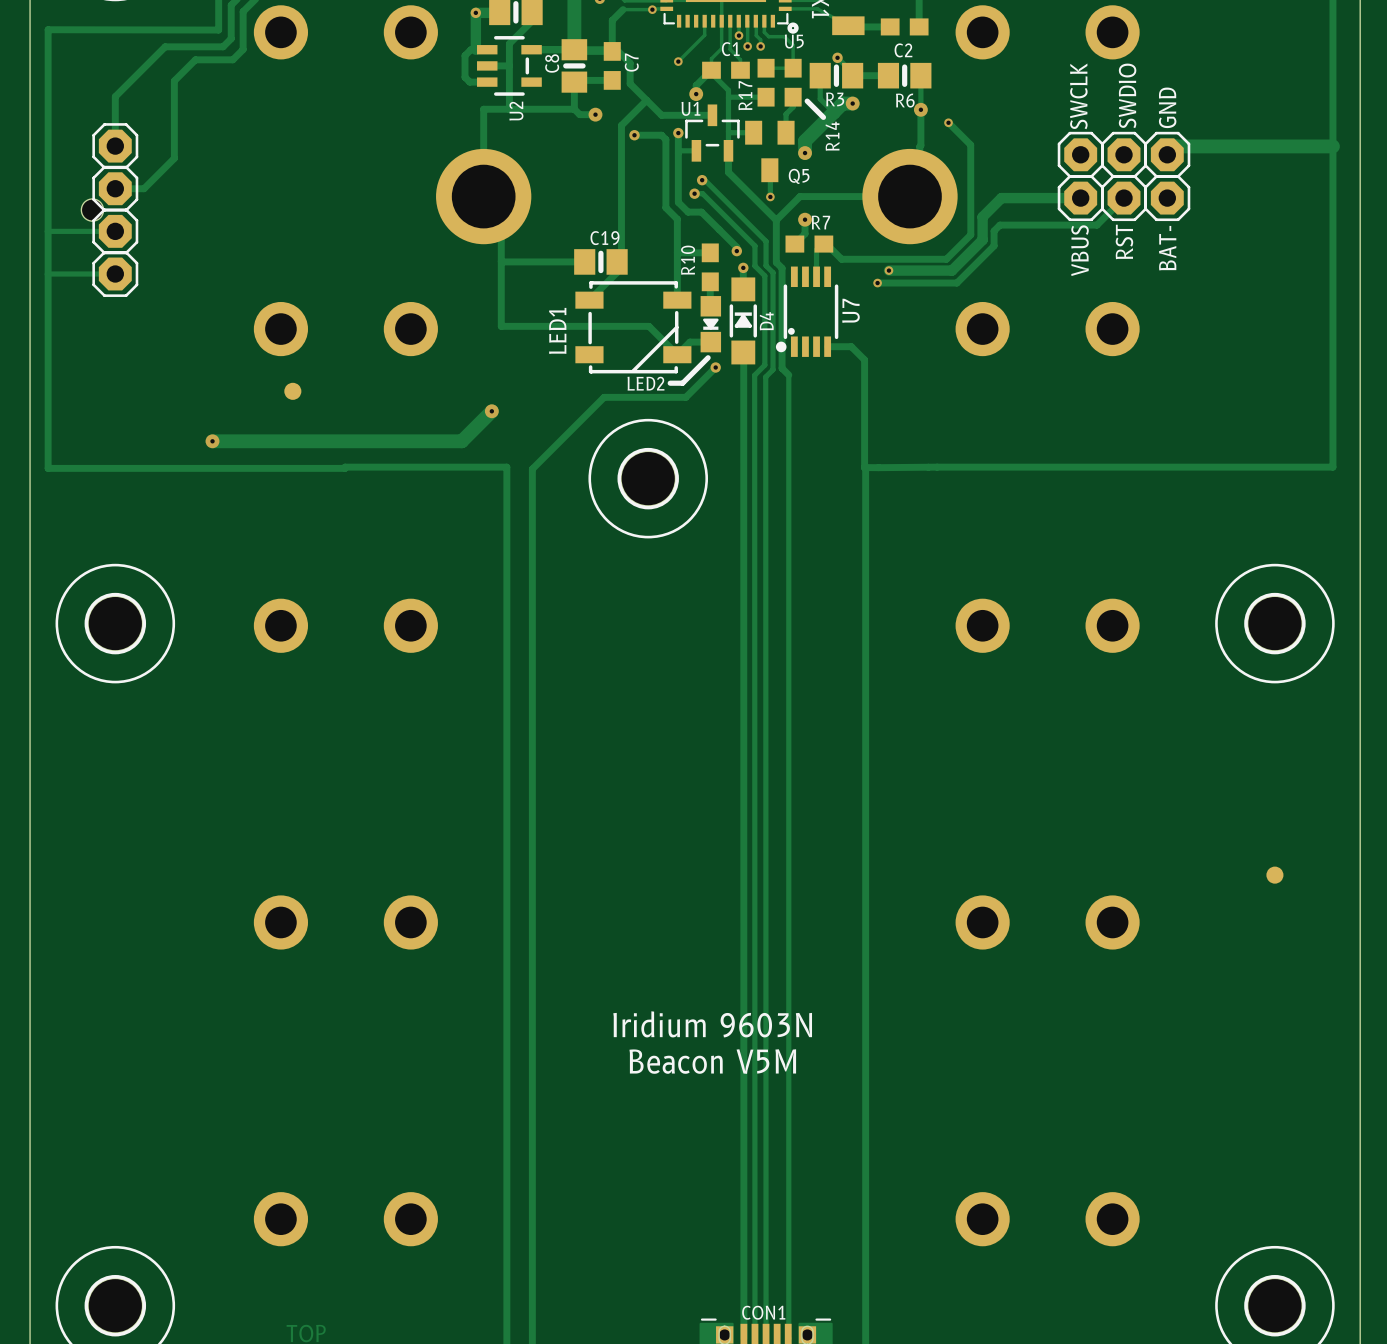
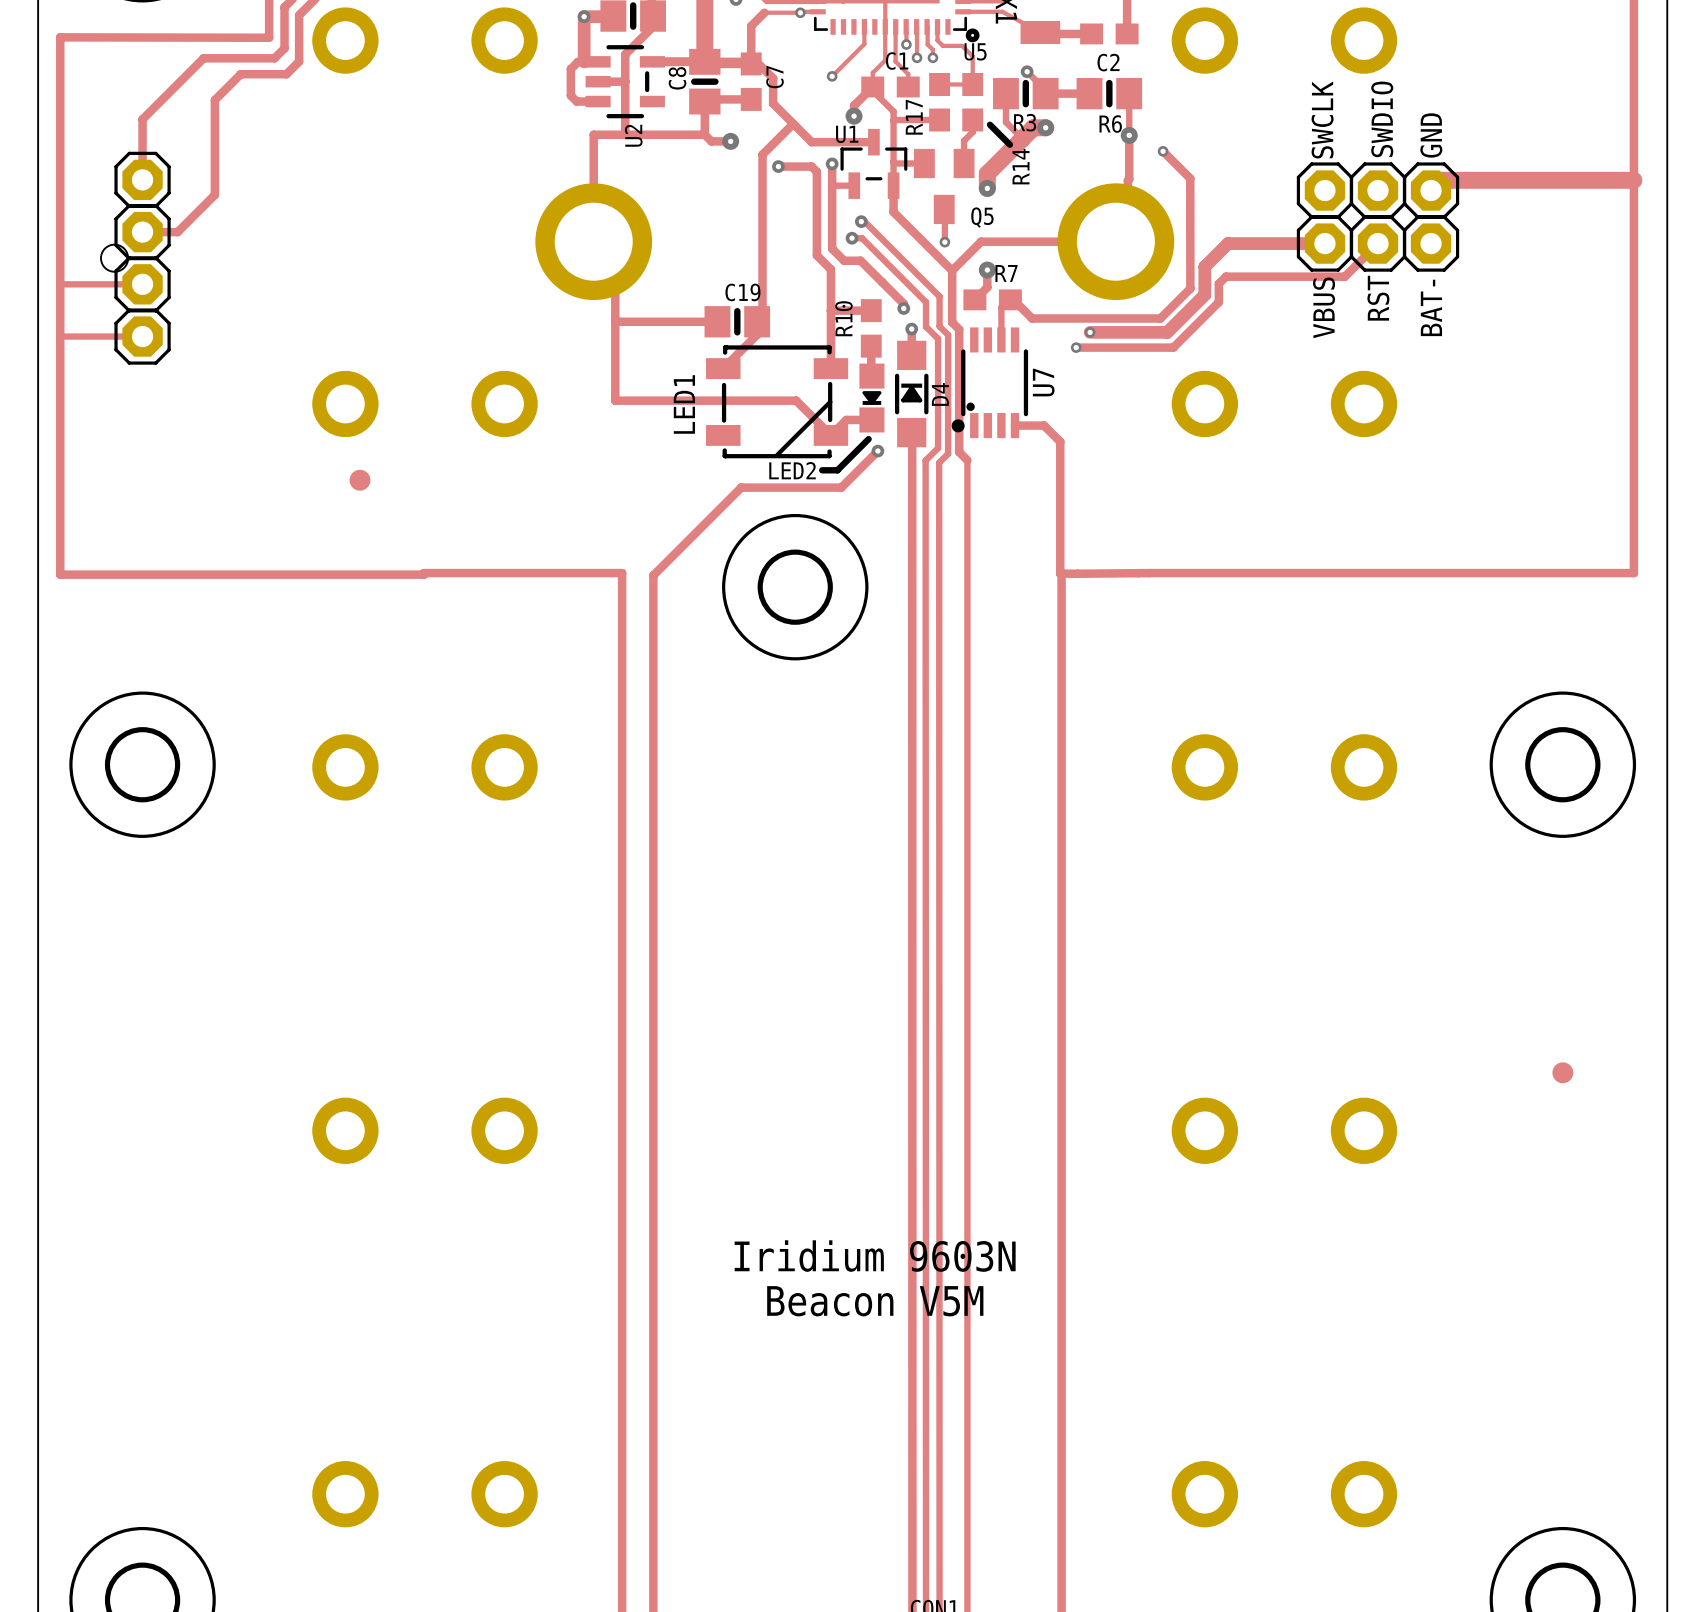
track: (491, 411) (461, 441) (212, 441) -> none
via: (491, 411) -> none
via: (212, 441) -> none

